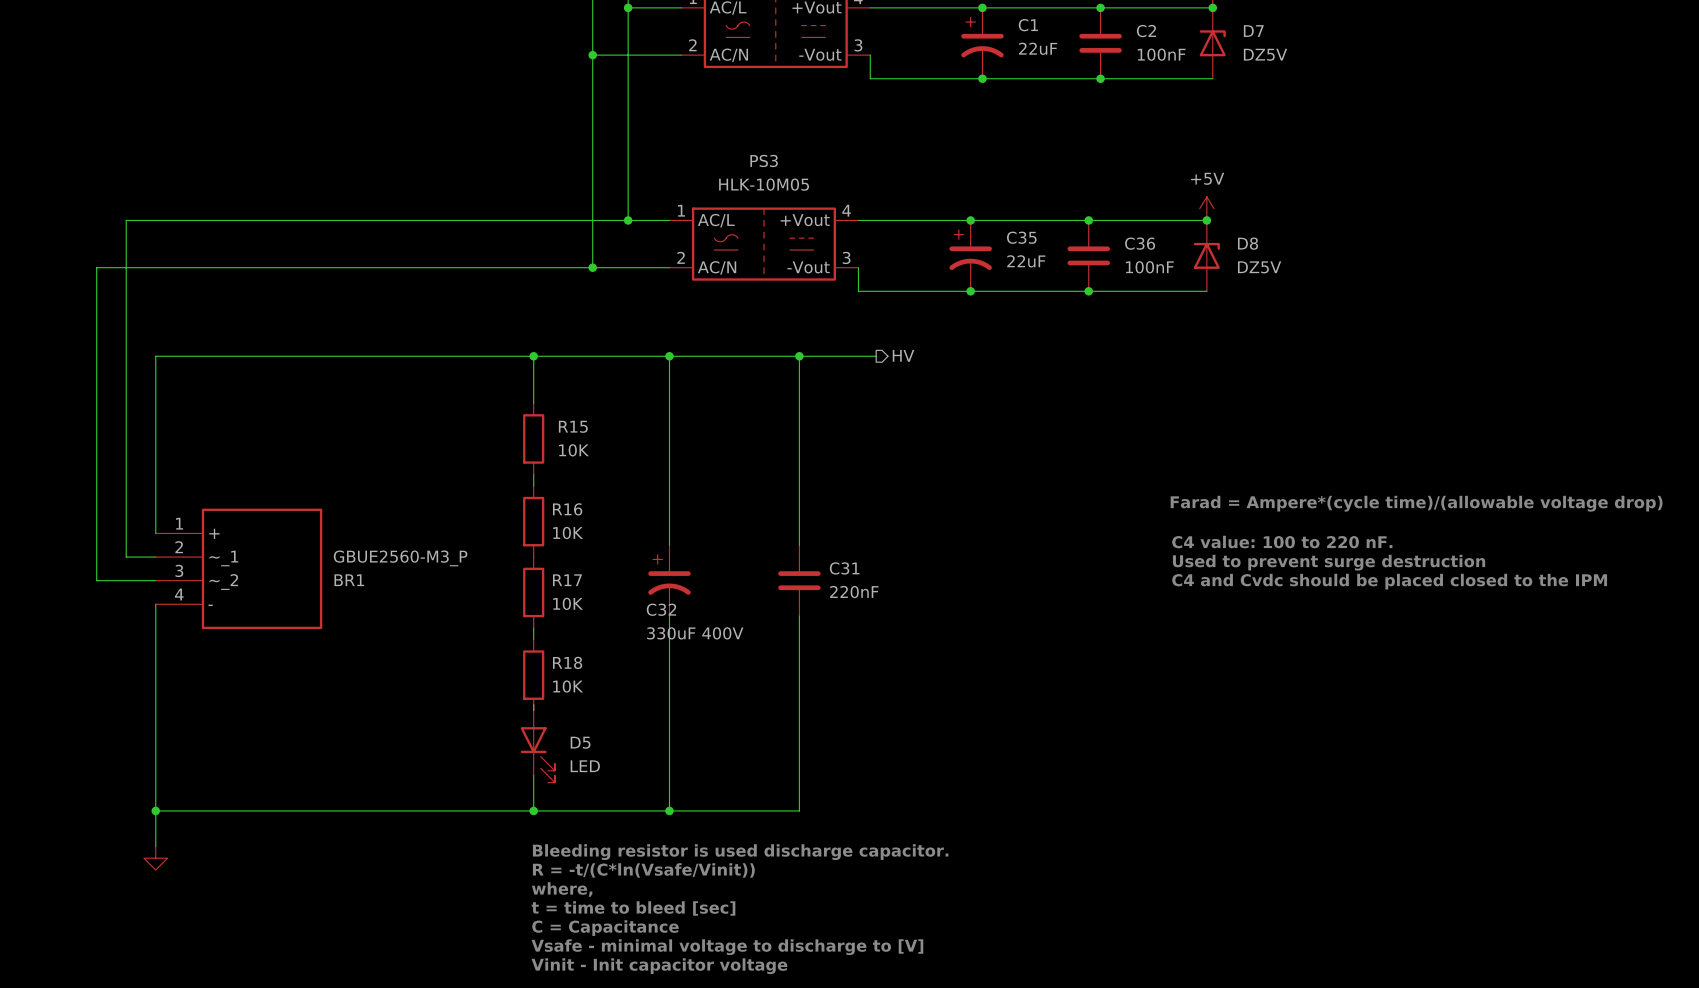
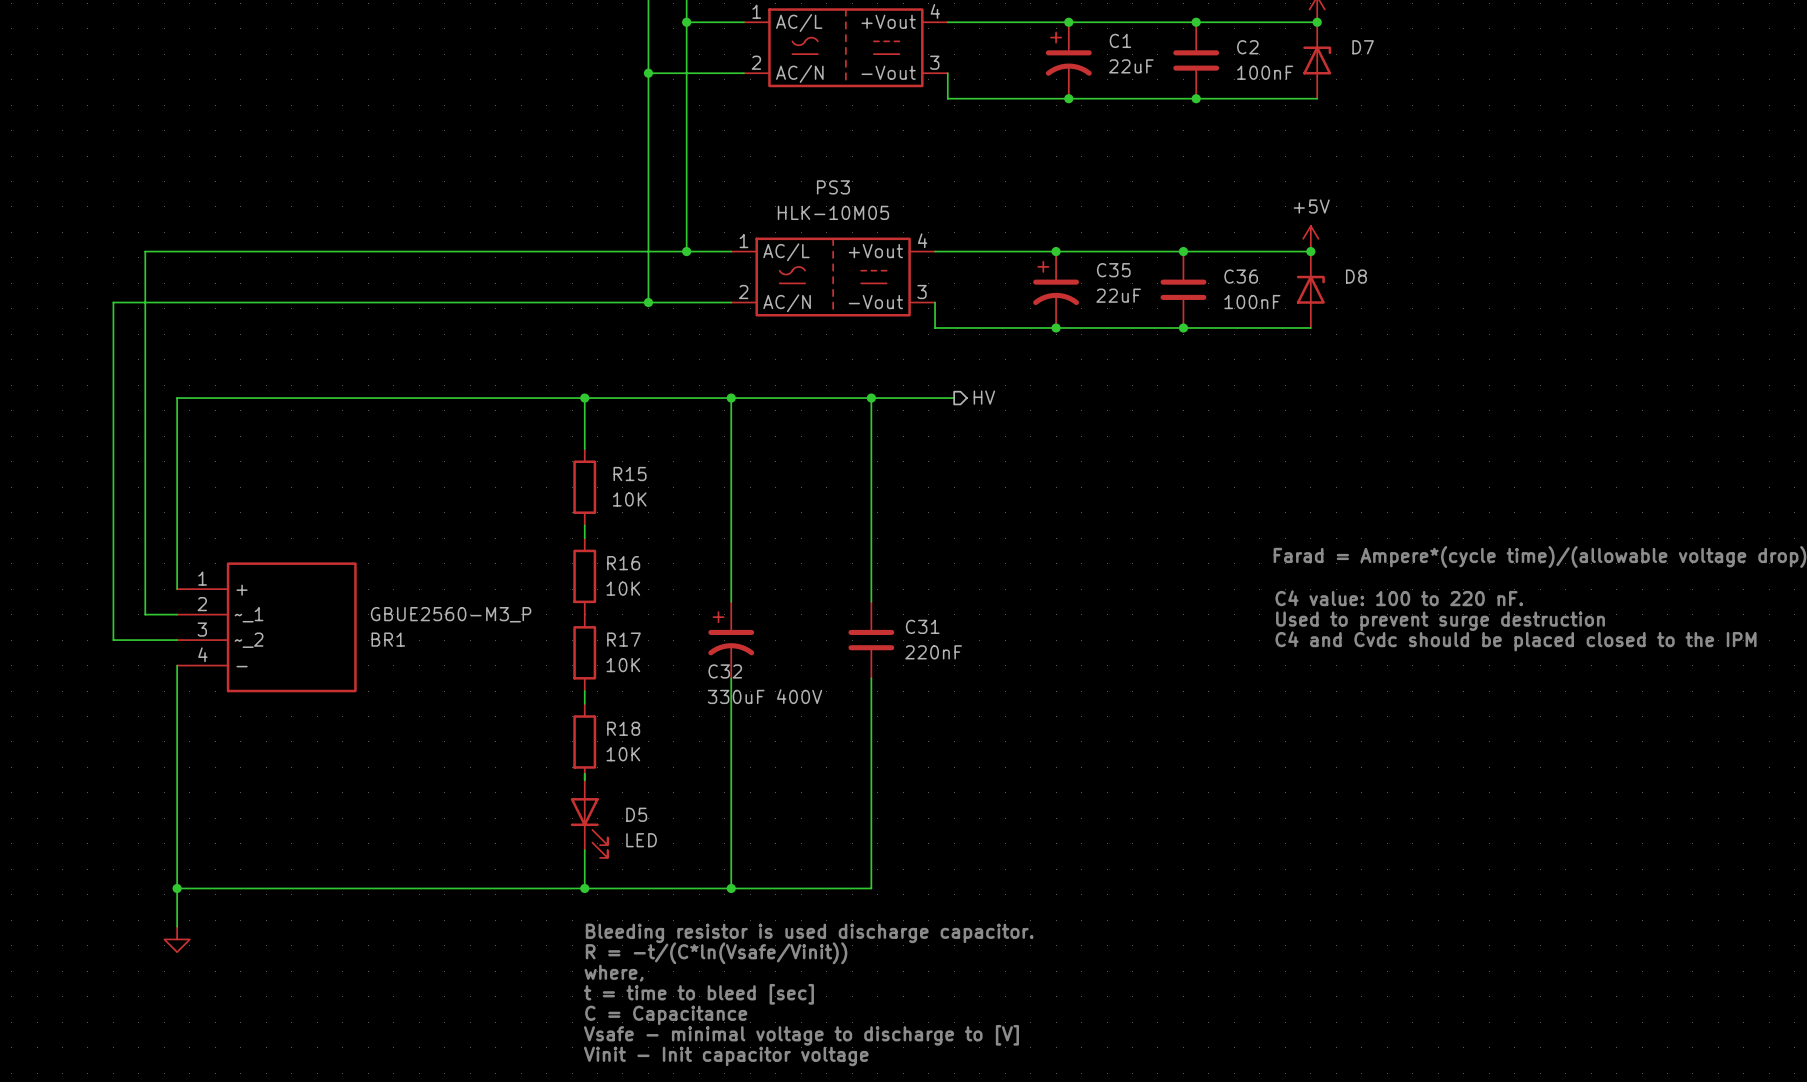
D7 value: DZ5V (1265, 54) -> none
D8 value: DZ5V (1259, 267) -> none

